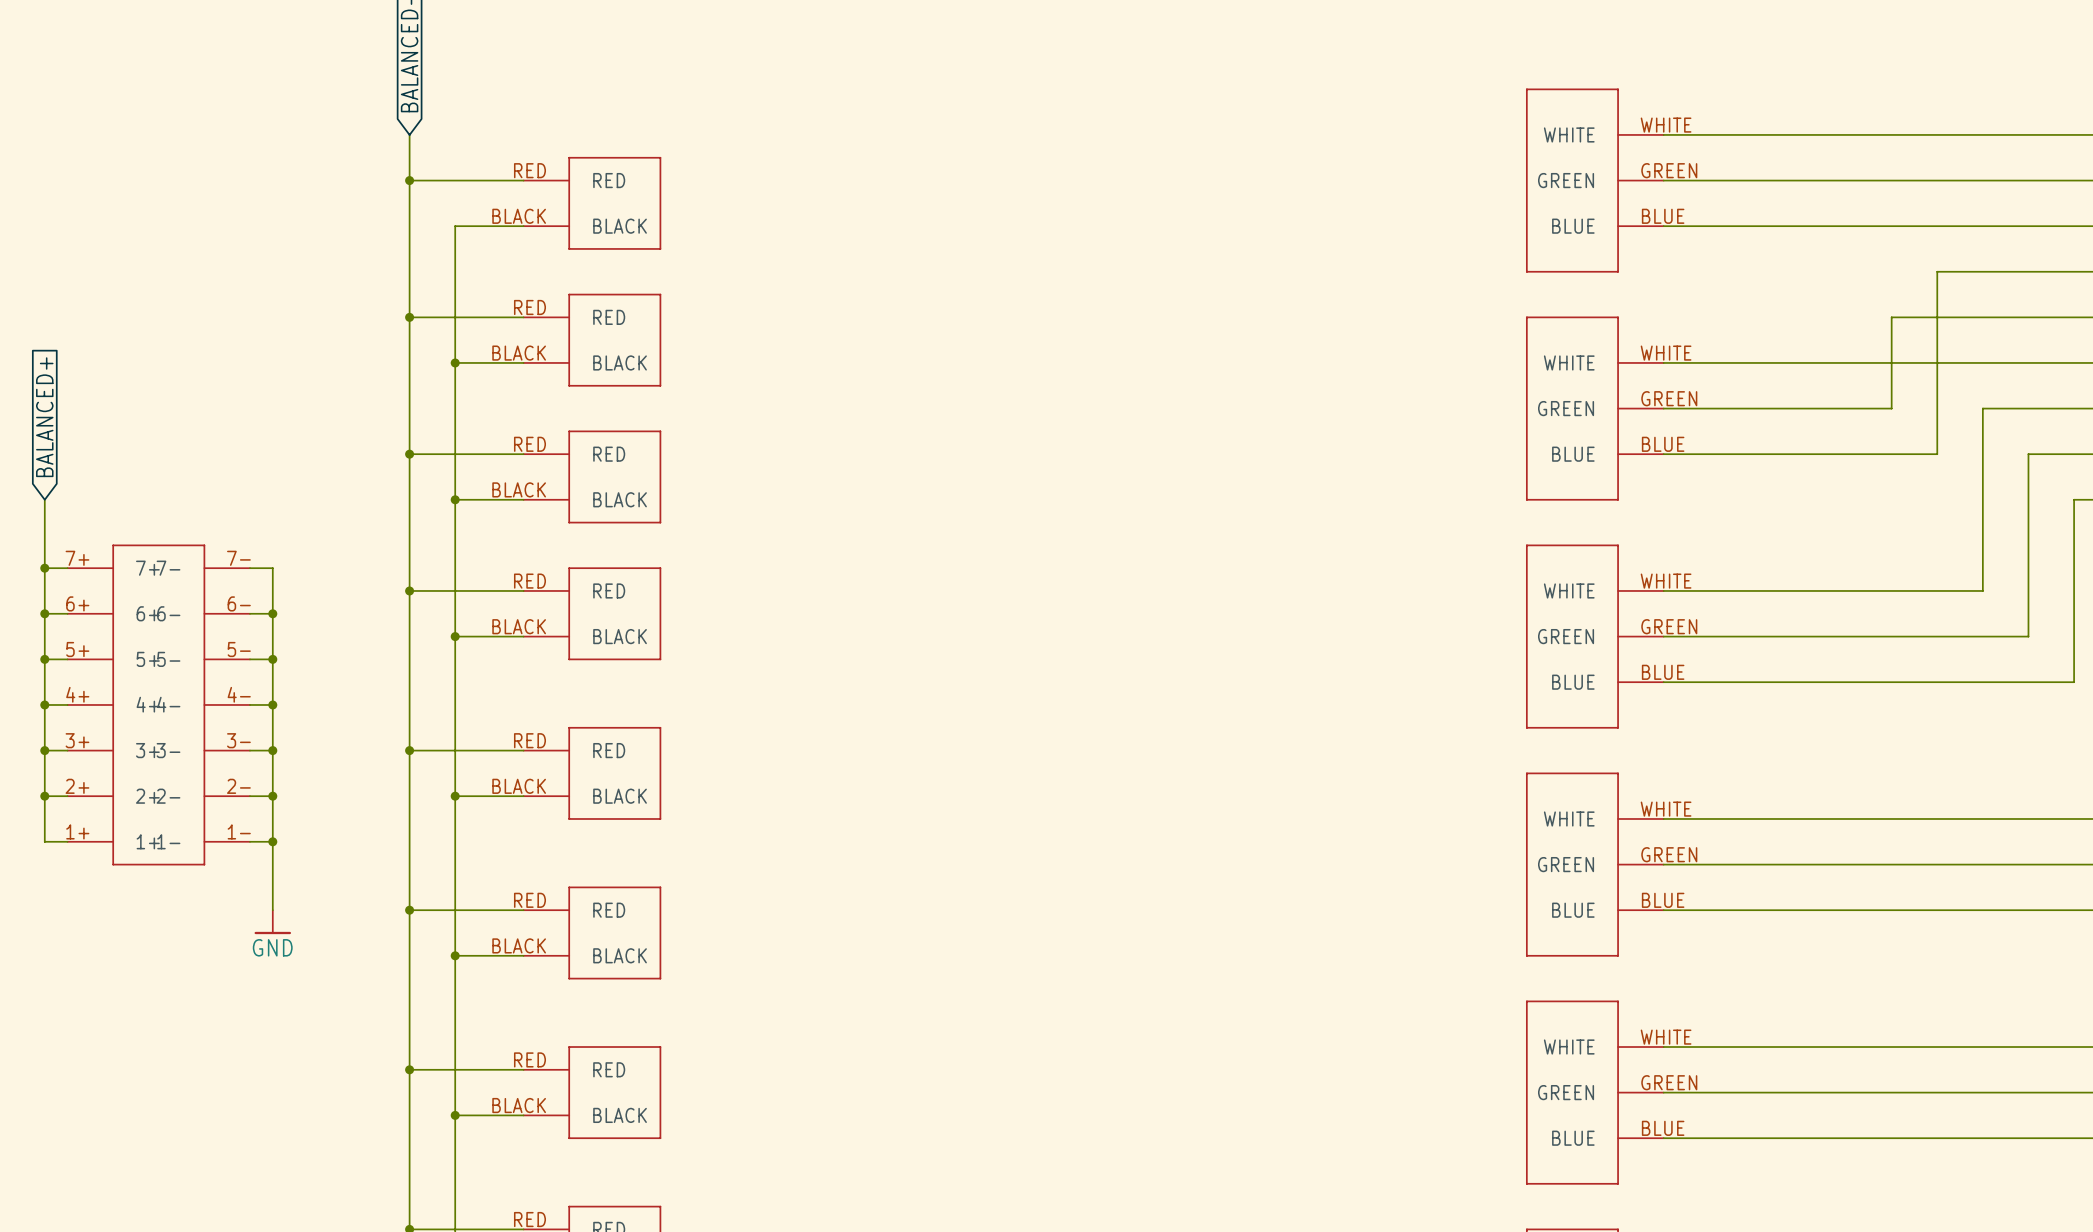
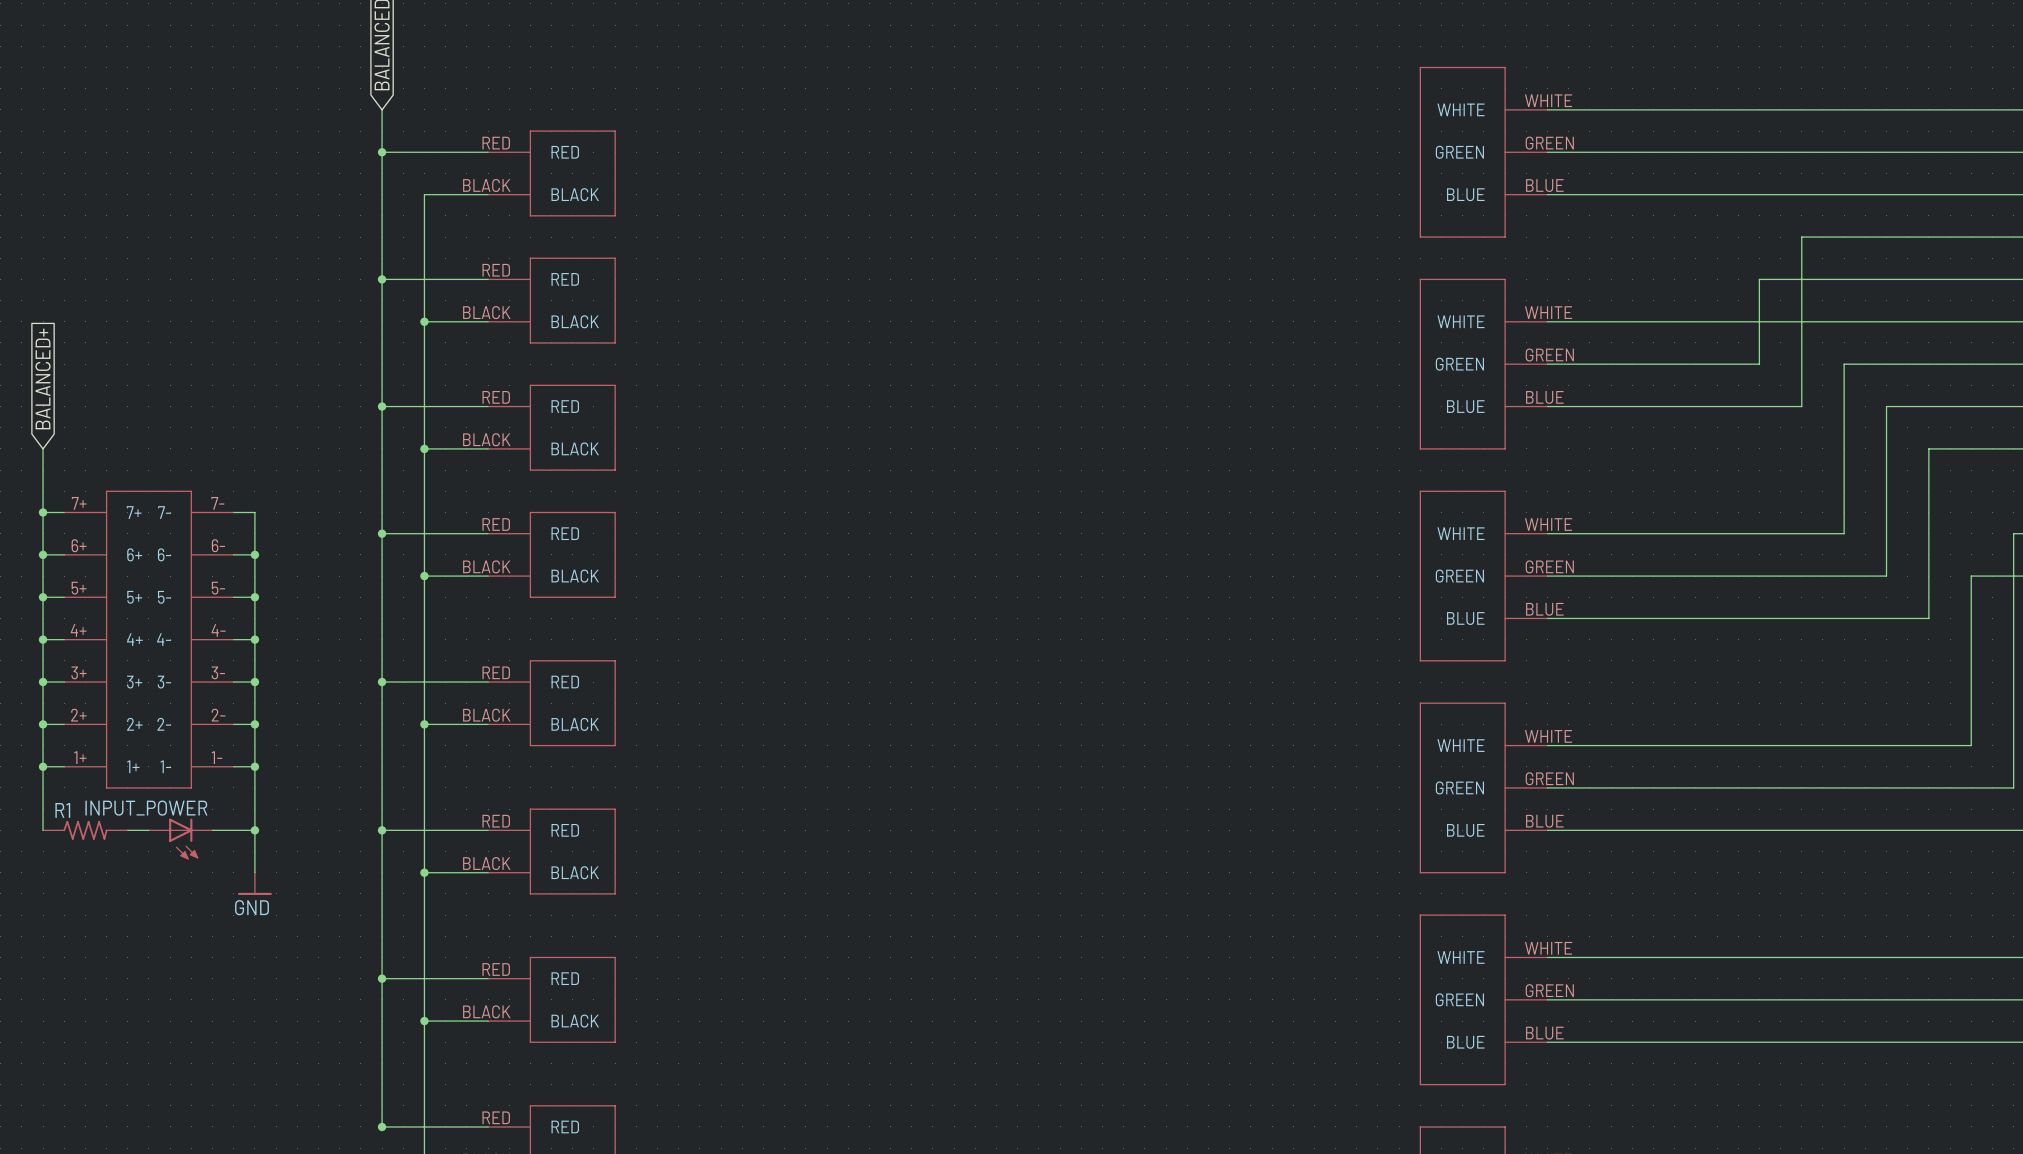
wire: none -> (43, 766) (43, 830)
junction: none -> (43, 766)
R1: none -> (85, 830)
wire: none -> (127, 830) (148, 830)
wire: none -> (212, 830) (254, 830) (254, 872)
junction: none -> (254, 830)
INPUT_POWER: none -> (180, 839)
power symbol position: GND (272, 922) -> GND (254, 883)

